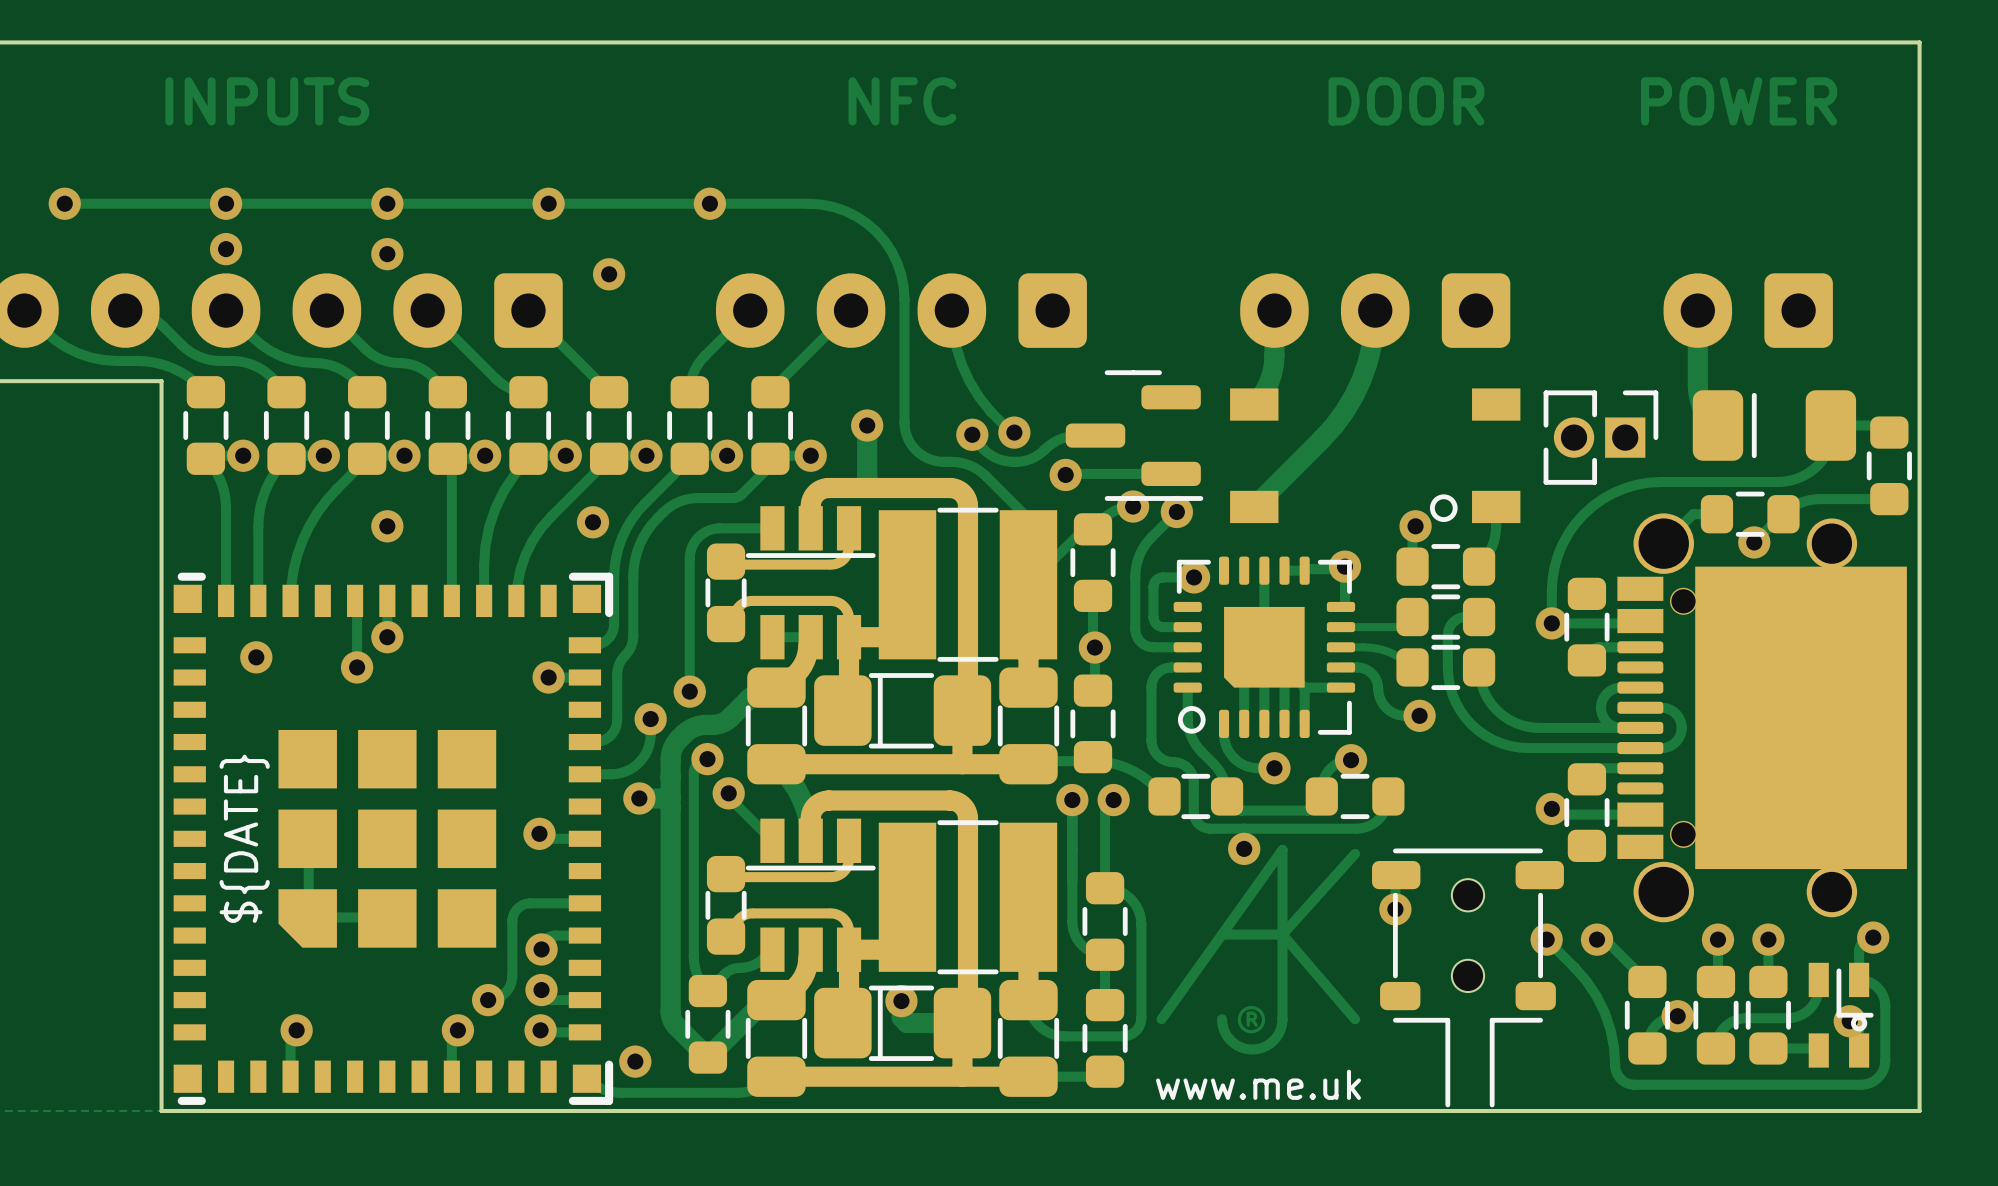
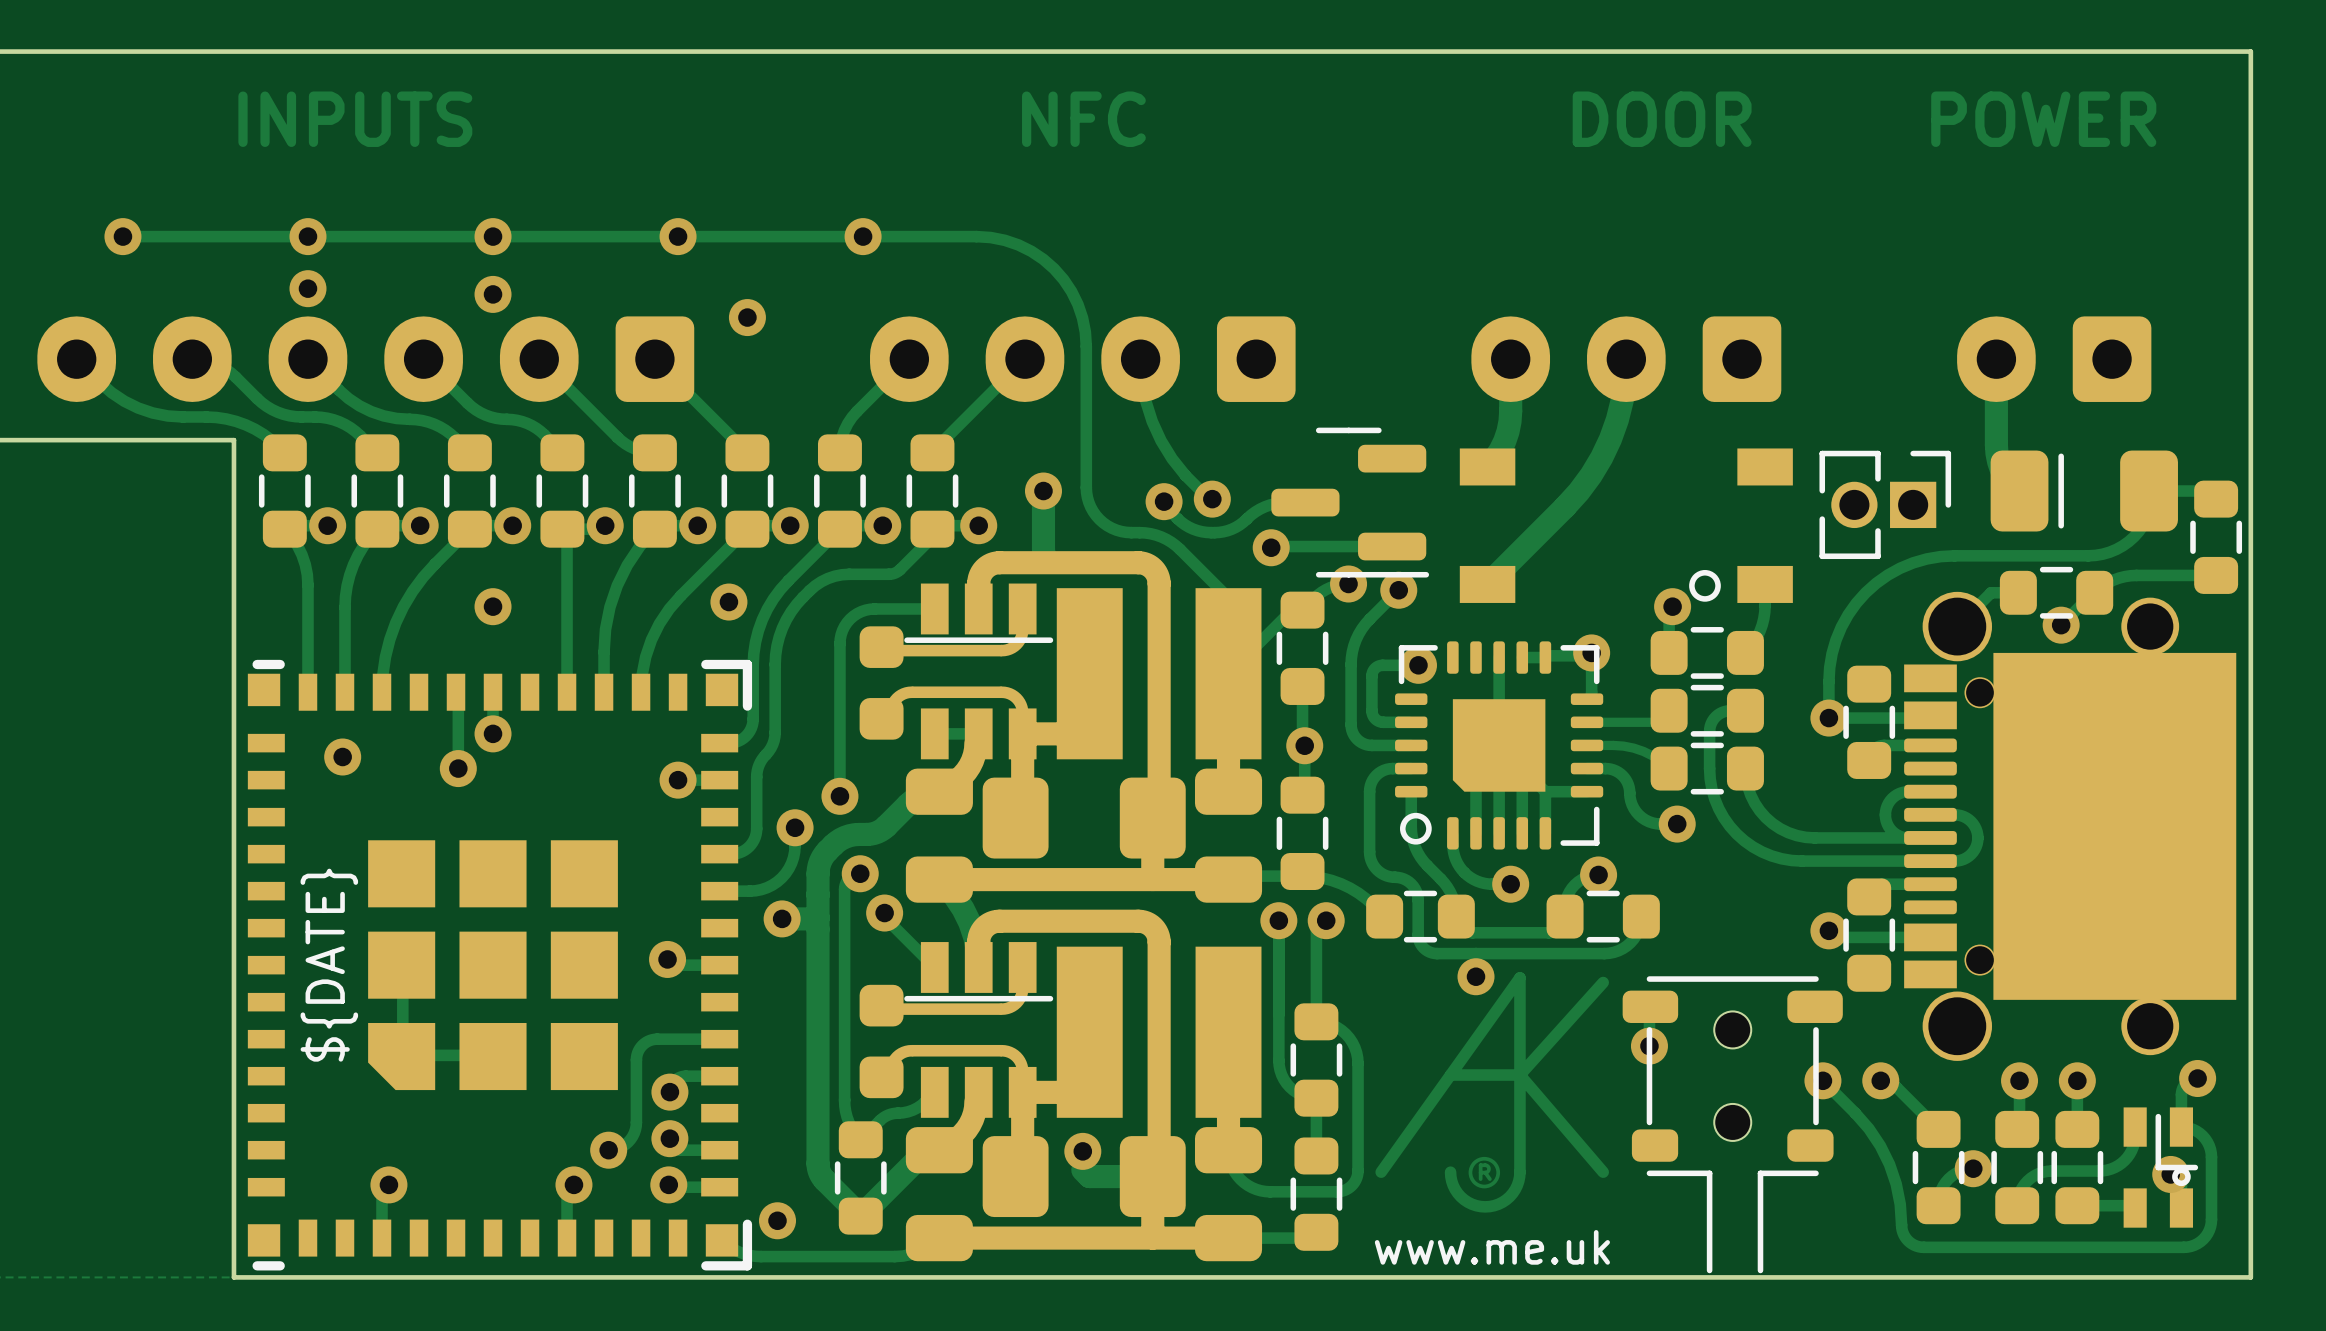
part footprint: [705, 477, 1060, 785] -> [859, 551, 1263, 903]
part footprint: [705, 790, 1060, 1097] -> [859, 909, 1263, 1262]

